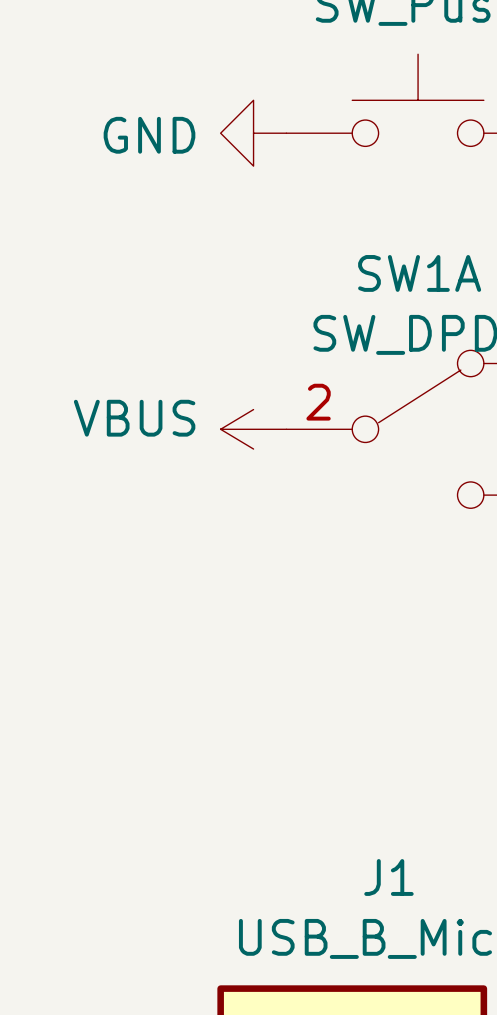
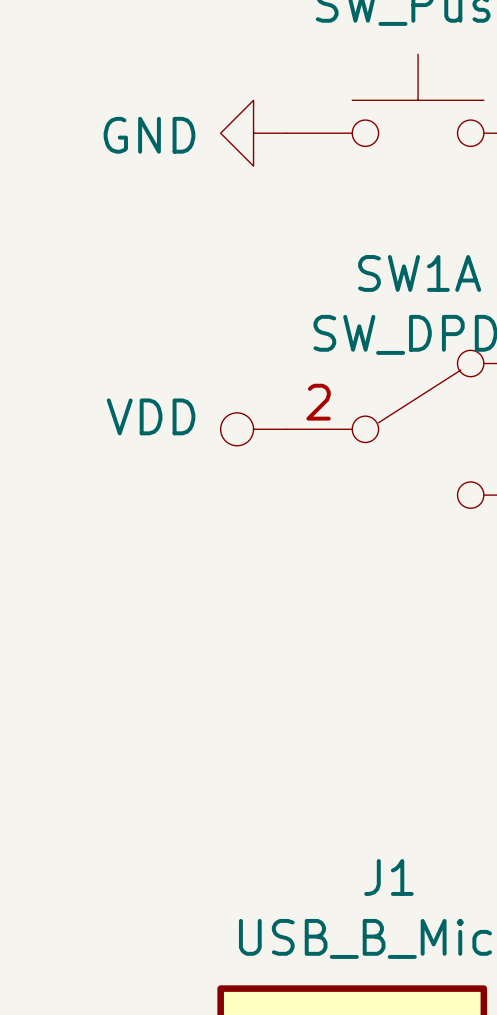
power symbol: VBUS (253, 429) -> VDD (253, 429)

